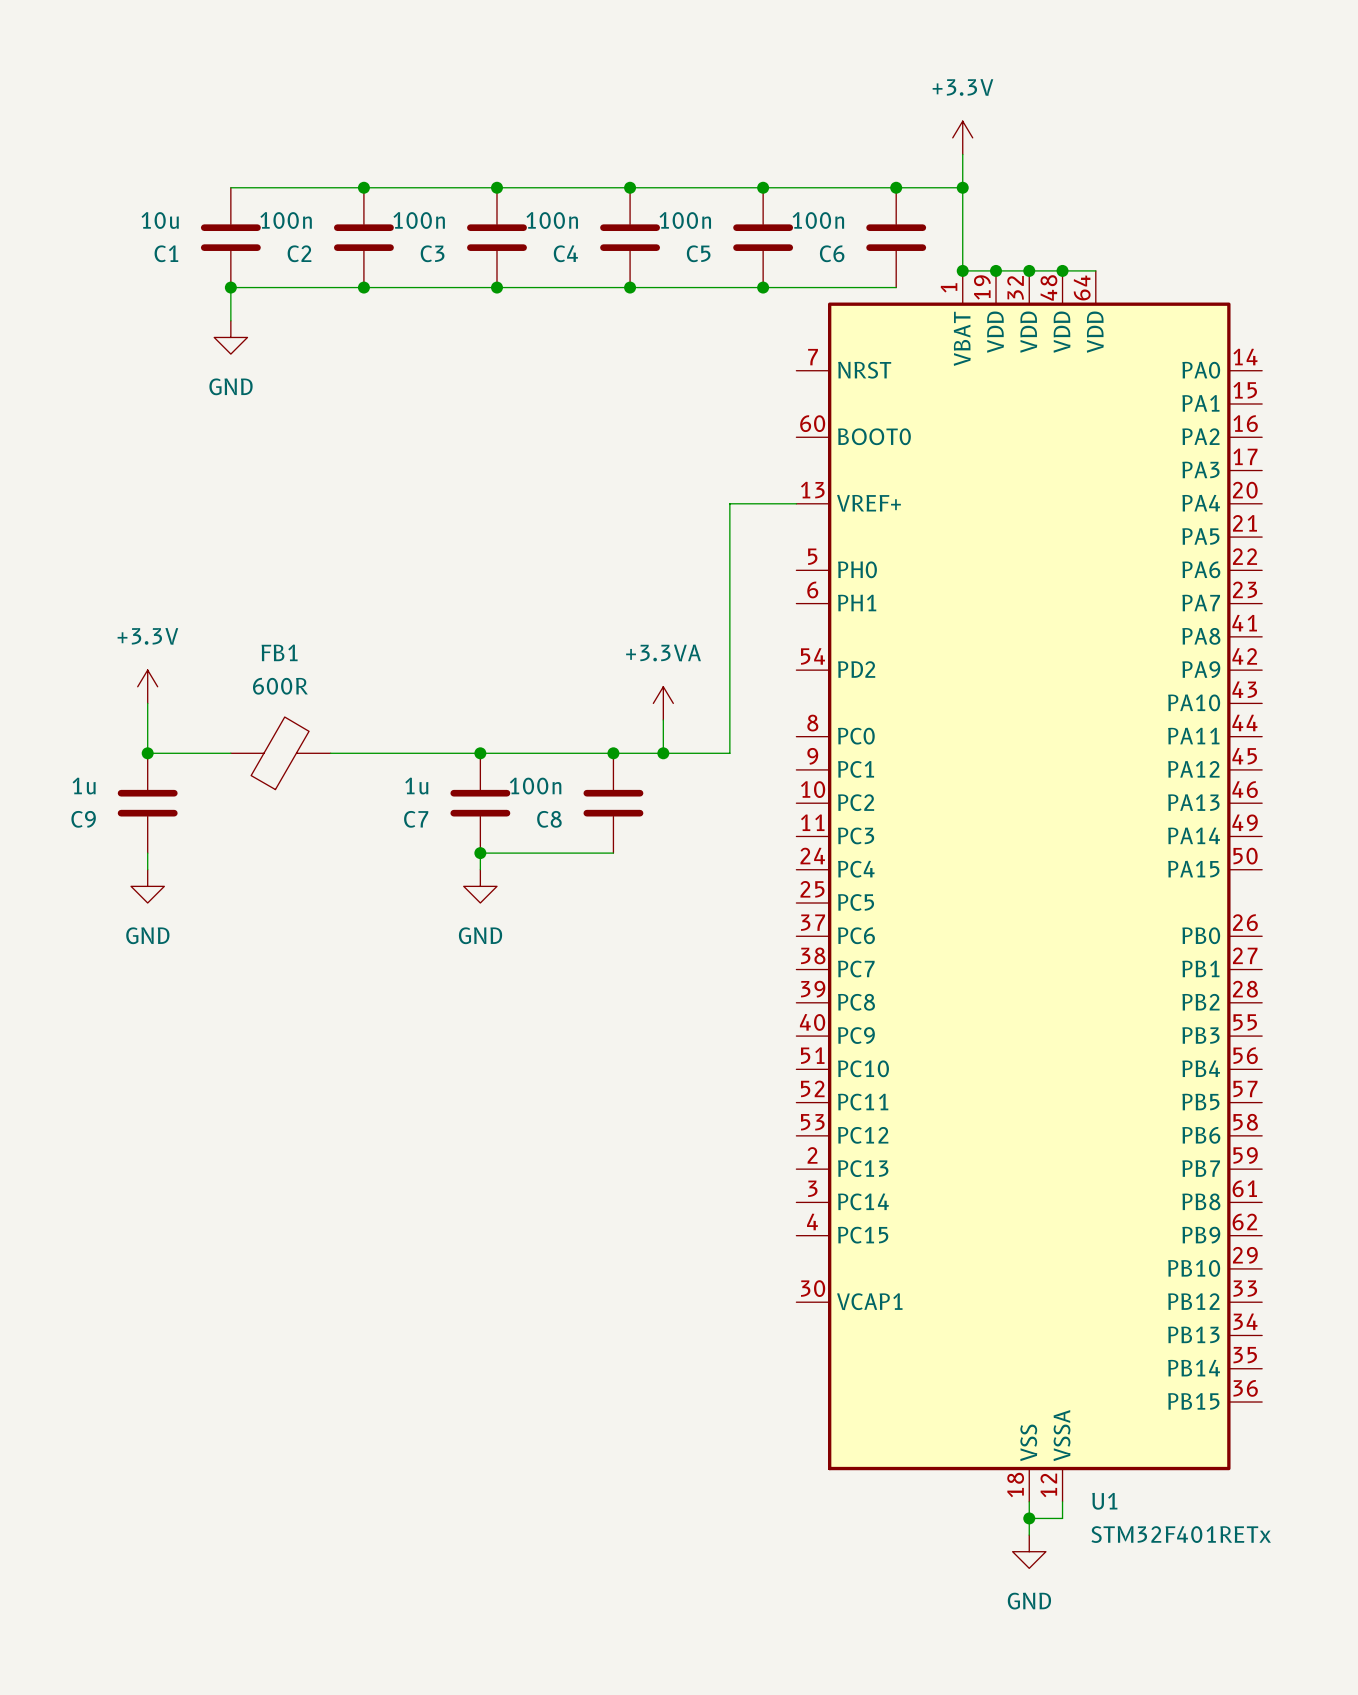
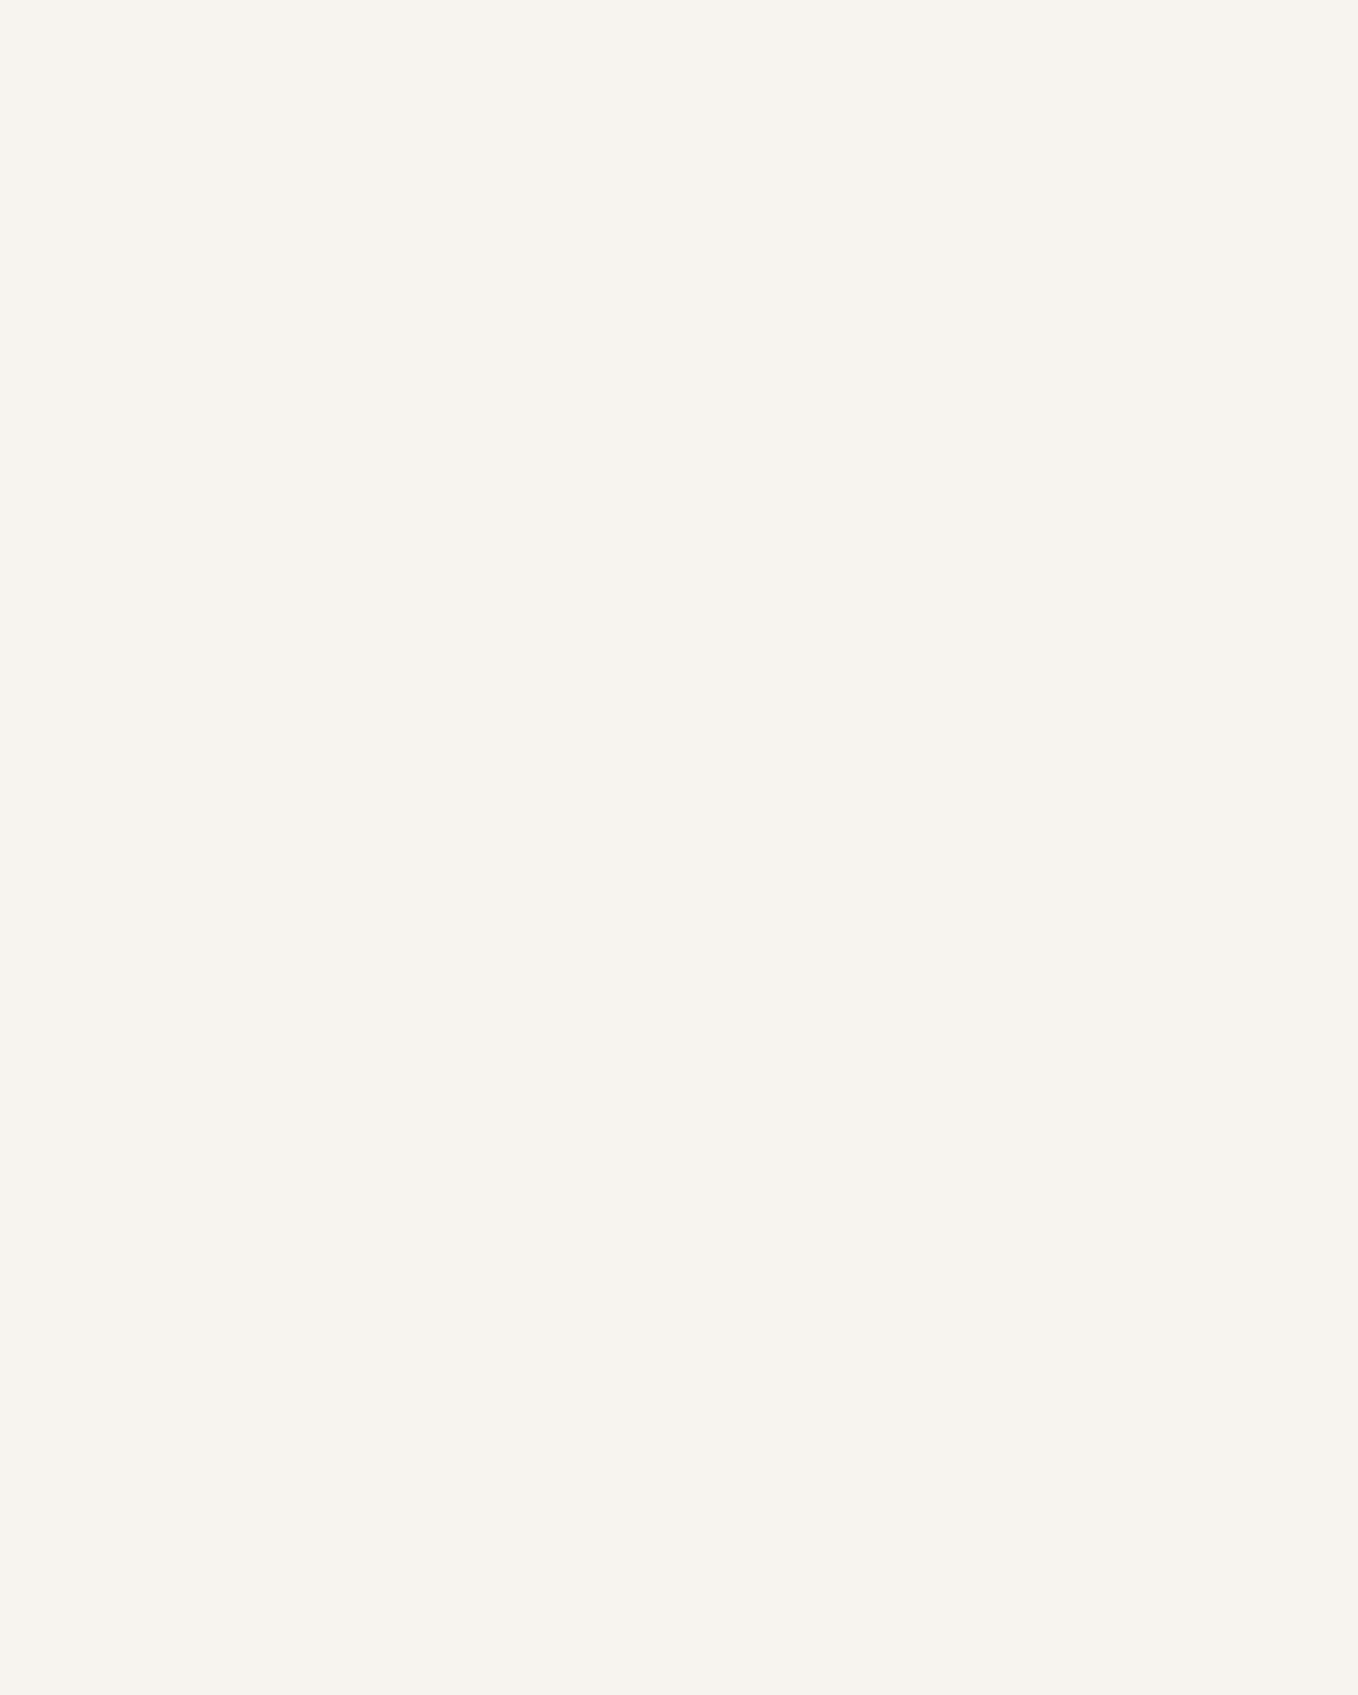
power symbol: +3.3V (962, 137) -> none
wire: (962, 154) (962, 270) (1095, 270) -> none
wire: (230, 187) (962, 187) -> none
junction: (363, 187) -> none
junction: (496, 187) -> none
junction: (630, 187) -> none
junction: (763, 187) -> none
junction: (896, 187) -> none
junction: (962, 187) -> none
C1: 10u (230, 237) -> none
C2: 100n (363, 237) -> none
C3: 100n (496, 237) -> none
C4: 100n (630, 237) -> none
C5: 100n (763, 237) -> none
C6: 100n (896, 237) -> none
junction: (962, 270) -> none
junction: (996, 270) -> none
junction: (1029, 270) -> none
junction: (1062, 270) -> none
junction: (230, 287) -> none
junction: (363, 287) -> none
junction: (496, 287) -> none
junction: (630, 287) -> none
junction: (763, 287) -> none
wire: (896, 287) (230, 287) (230, 320) -> none
power symbol: GND (230, 337) -> none
wire: (796, 503) (729, 503) (729, 753) (330, 753) -> none
power symbol: +3.3V (147, 686) -> none
wire: (147, 703) (147, 753) (230, 753) -> none
power symbol: +3.3VA (663, 703) -> none
wire: (663, 720) (663, 753) -> none
junction: (147, 753) -> none
FB1: 600R (280, 753) -> none
junction: (480, 753) -> none
junction: (613, 753) -> none
junction: (663, 753) -> none
C9: 1u (147, 803) -> none
C7: 1u (480, 803) -> none
C8: 100n (613, 803) -> none
wire: (147, 853) (147, 869) -> none
junction: (480, 853) -> none
wire: (613, 853) (480, 853) (480, 869) -> none
power symbol: GND (147, 886) -> none
power symbol: GND (480, 886) -> none
U1: STM32F401RETx (1029, 886) -> none
wire: (1029, 1501) (1029, 1535) -> none
wire: (1062, 1501) (1062, 1518) (1029, 1518) -> none
junction: (1029, 1518) -> none
power symbol: GND (1029, 1551) -> none

